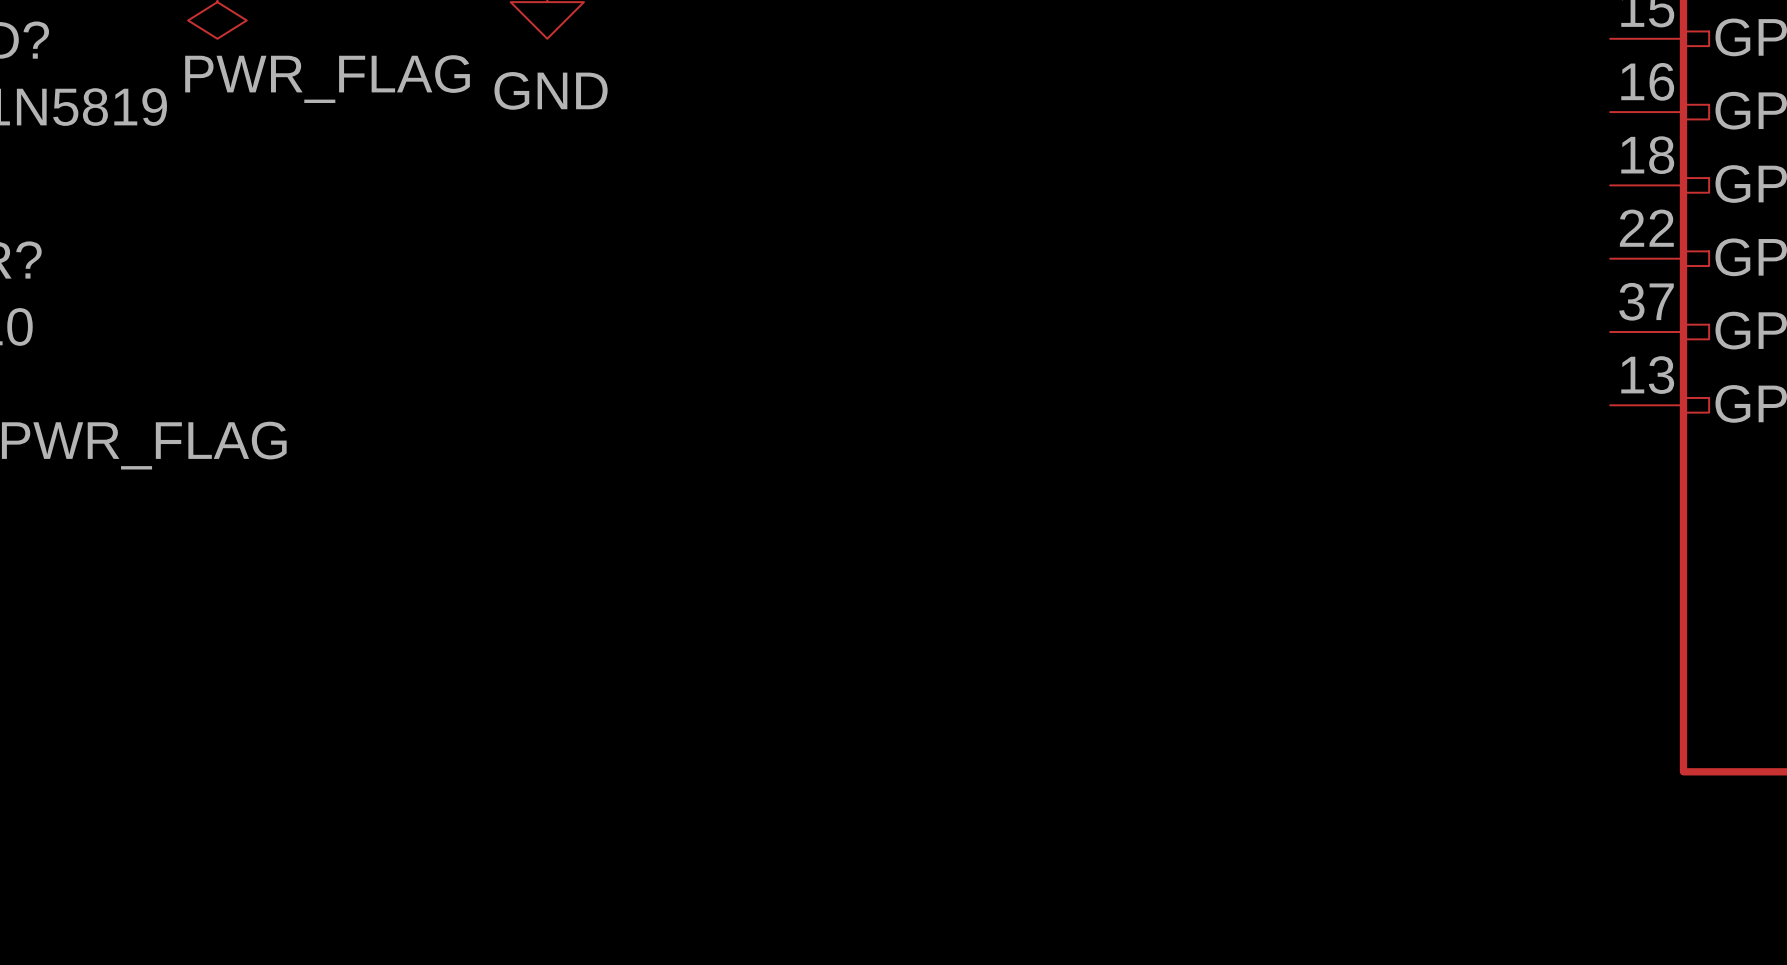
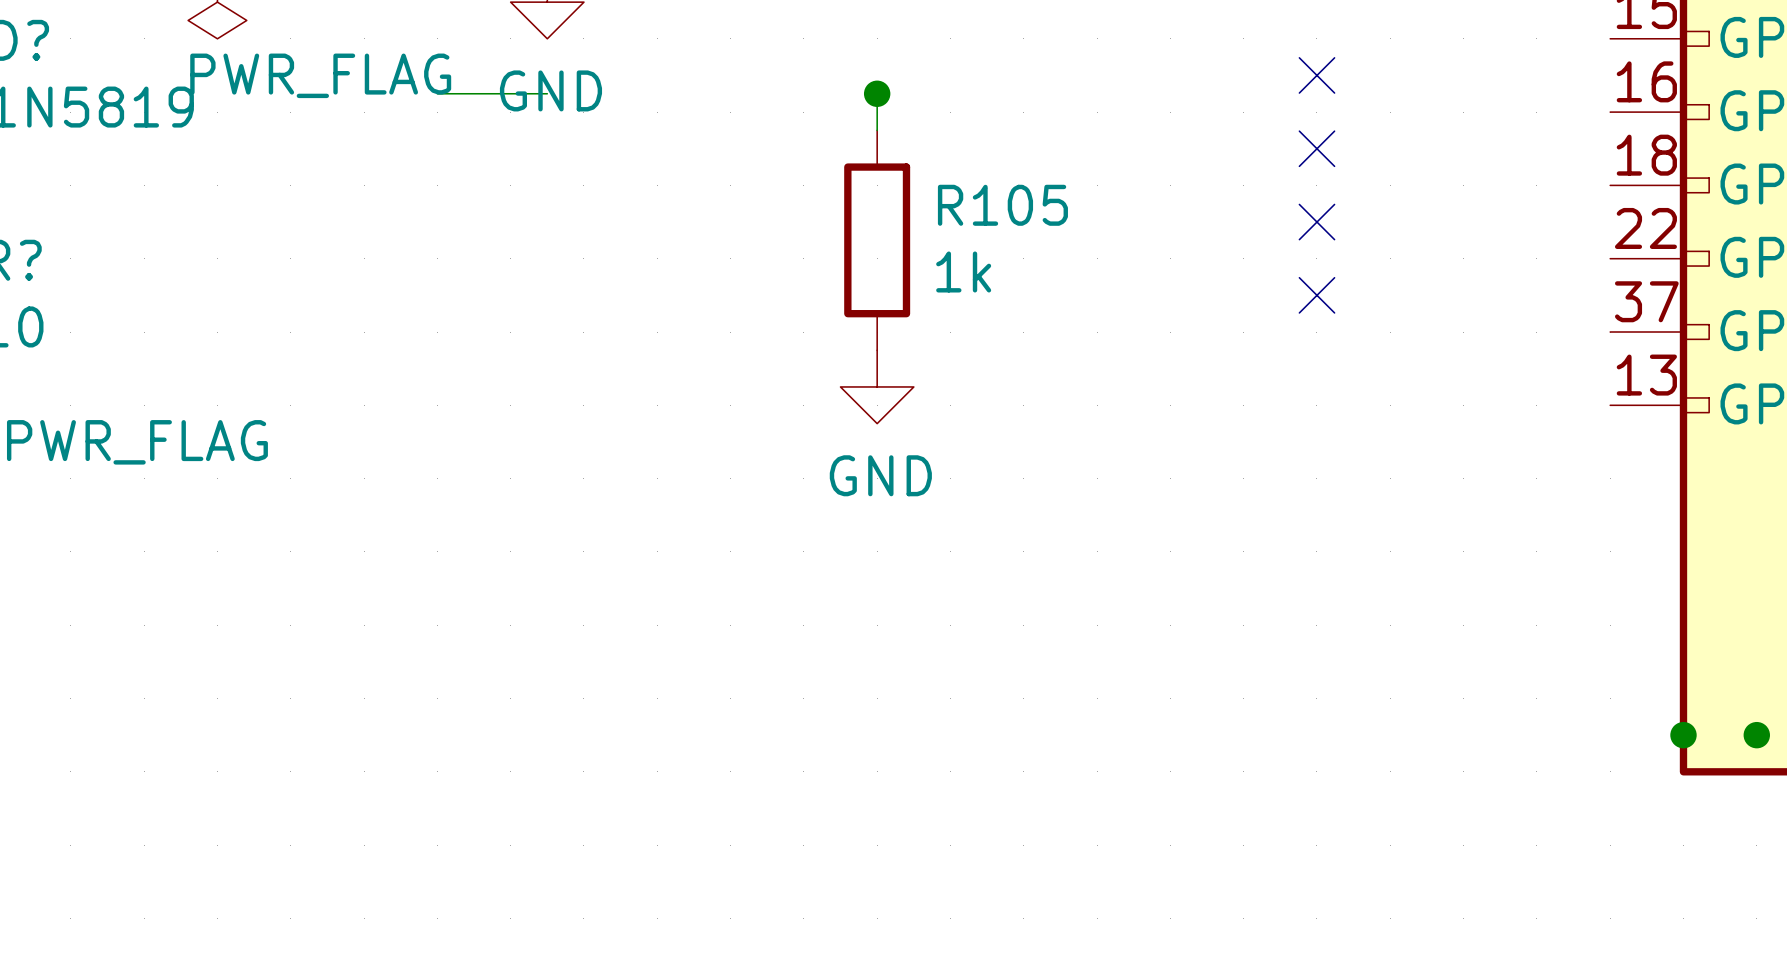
no-connect mark: none -> (1316, 75)
wire: none -> (437, 93) (547, 93)
wire: none -> (877, 93) (877, 130)
junction: none -> (877, 93)
no-connect mark: none -> (1316, 148)
no-connect mark: none -> (1316, 222)
R105: none -> 1k (877, 240)
no-connect mark: none -> (1316, 295)
power symbol: none -> GND (877, 386)
junction: none -> (1683, 735)
junction: none -> (1756, 735)

